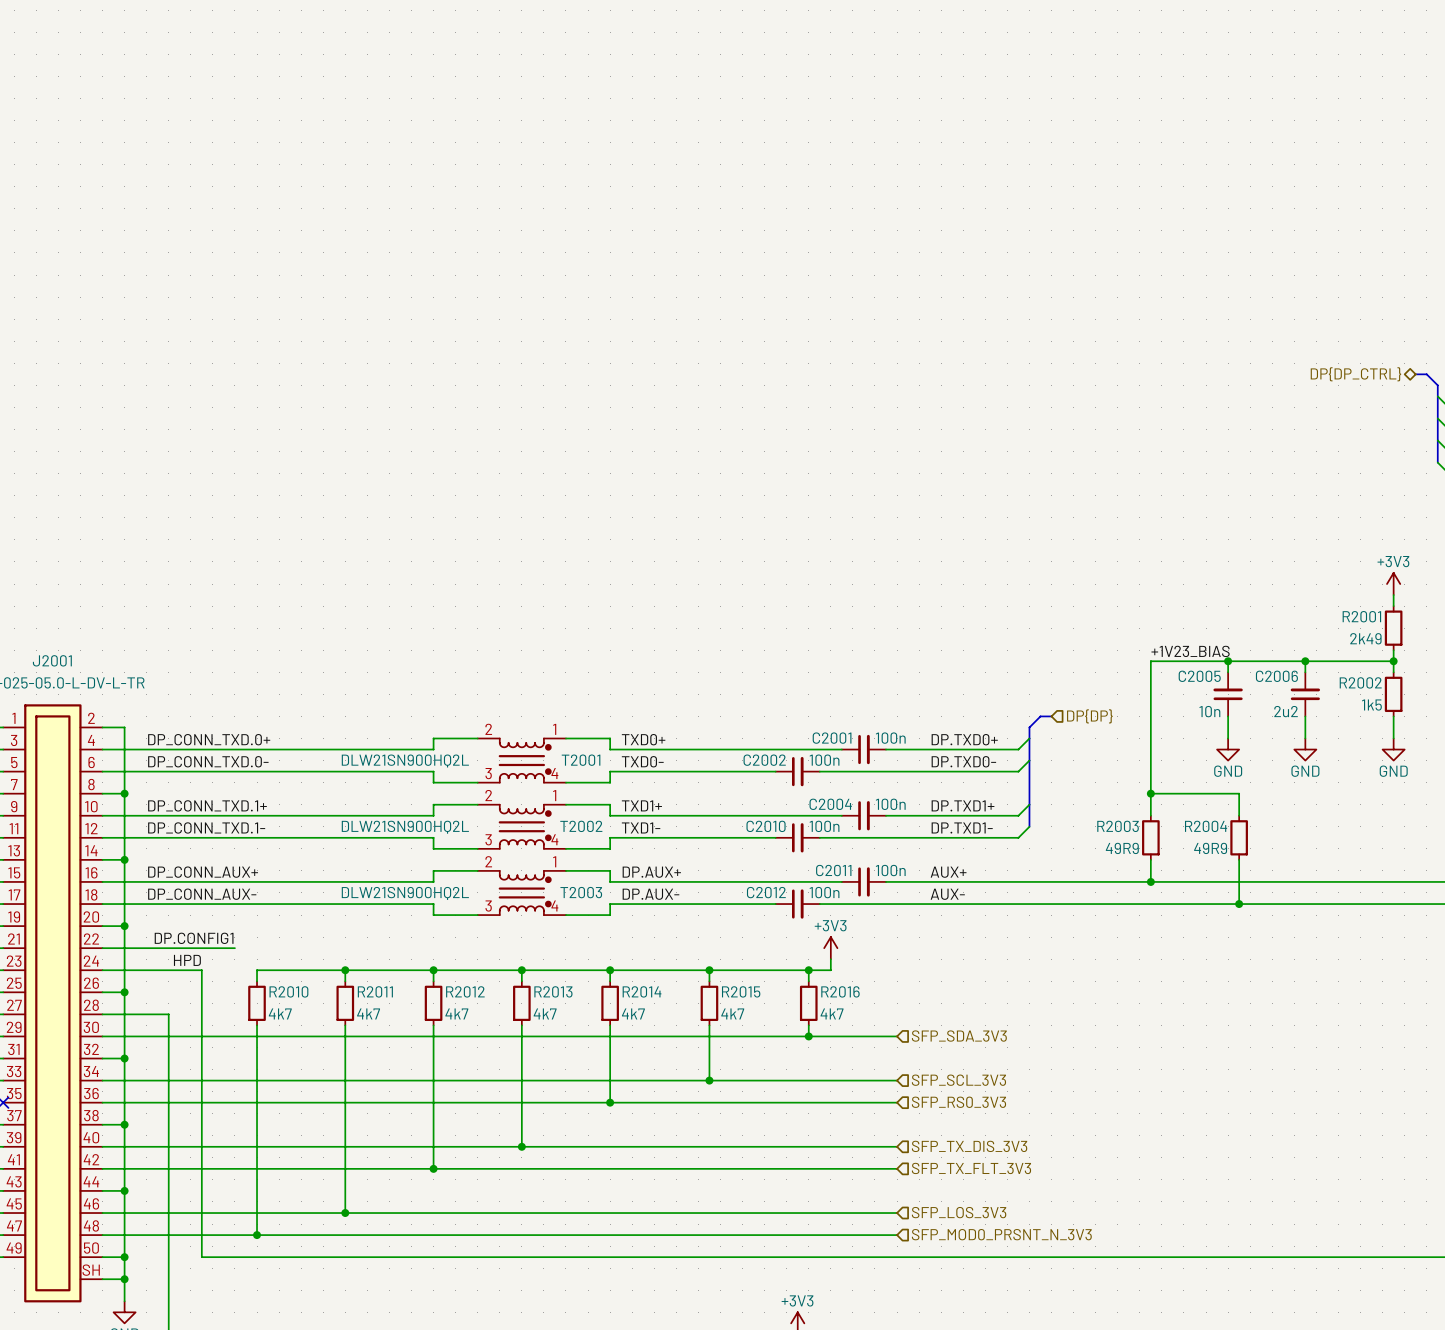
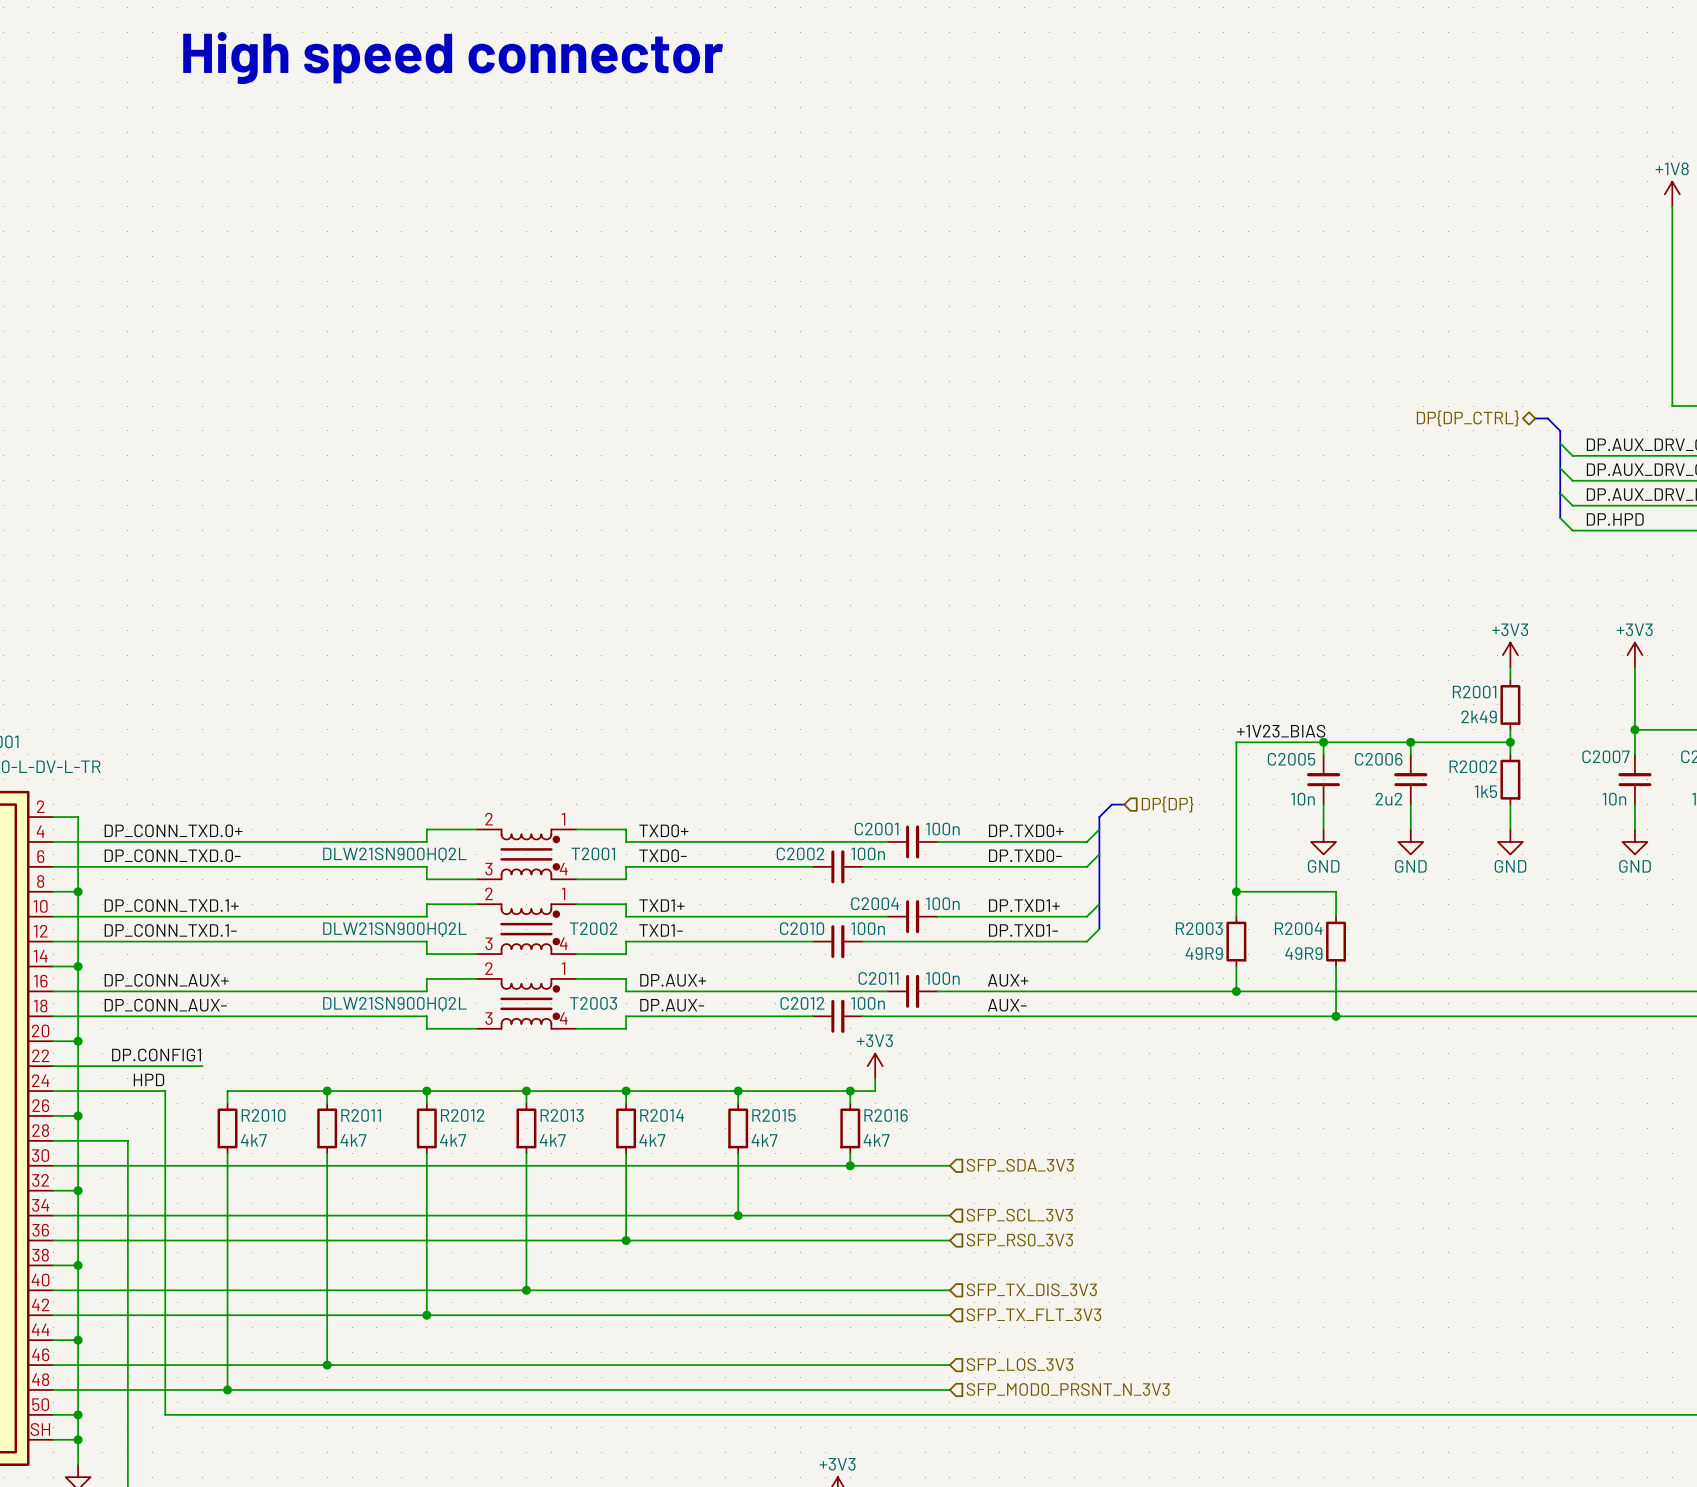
text: none -> High speed connector (453, 58)

